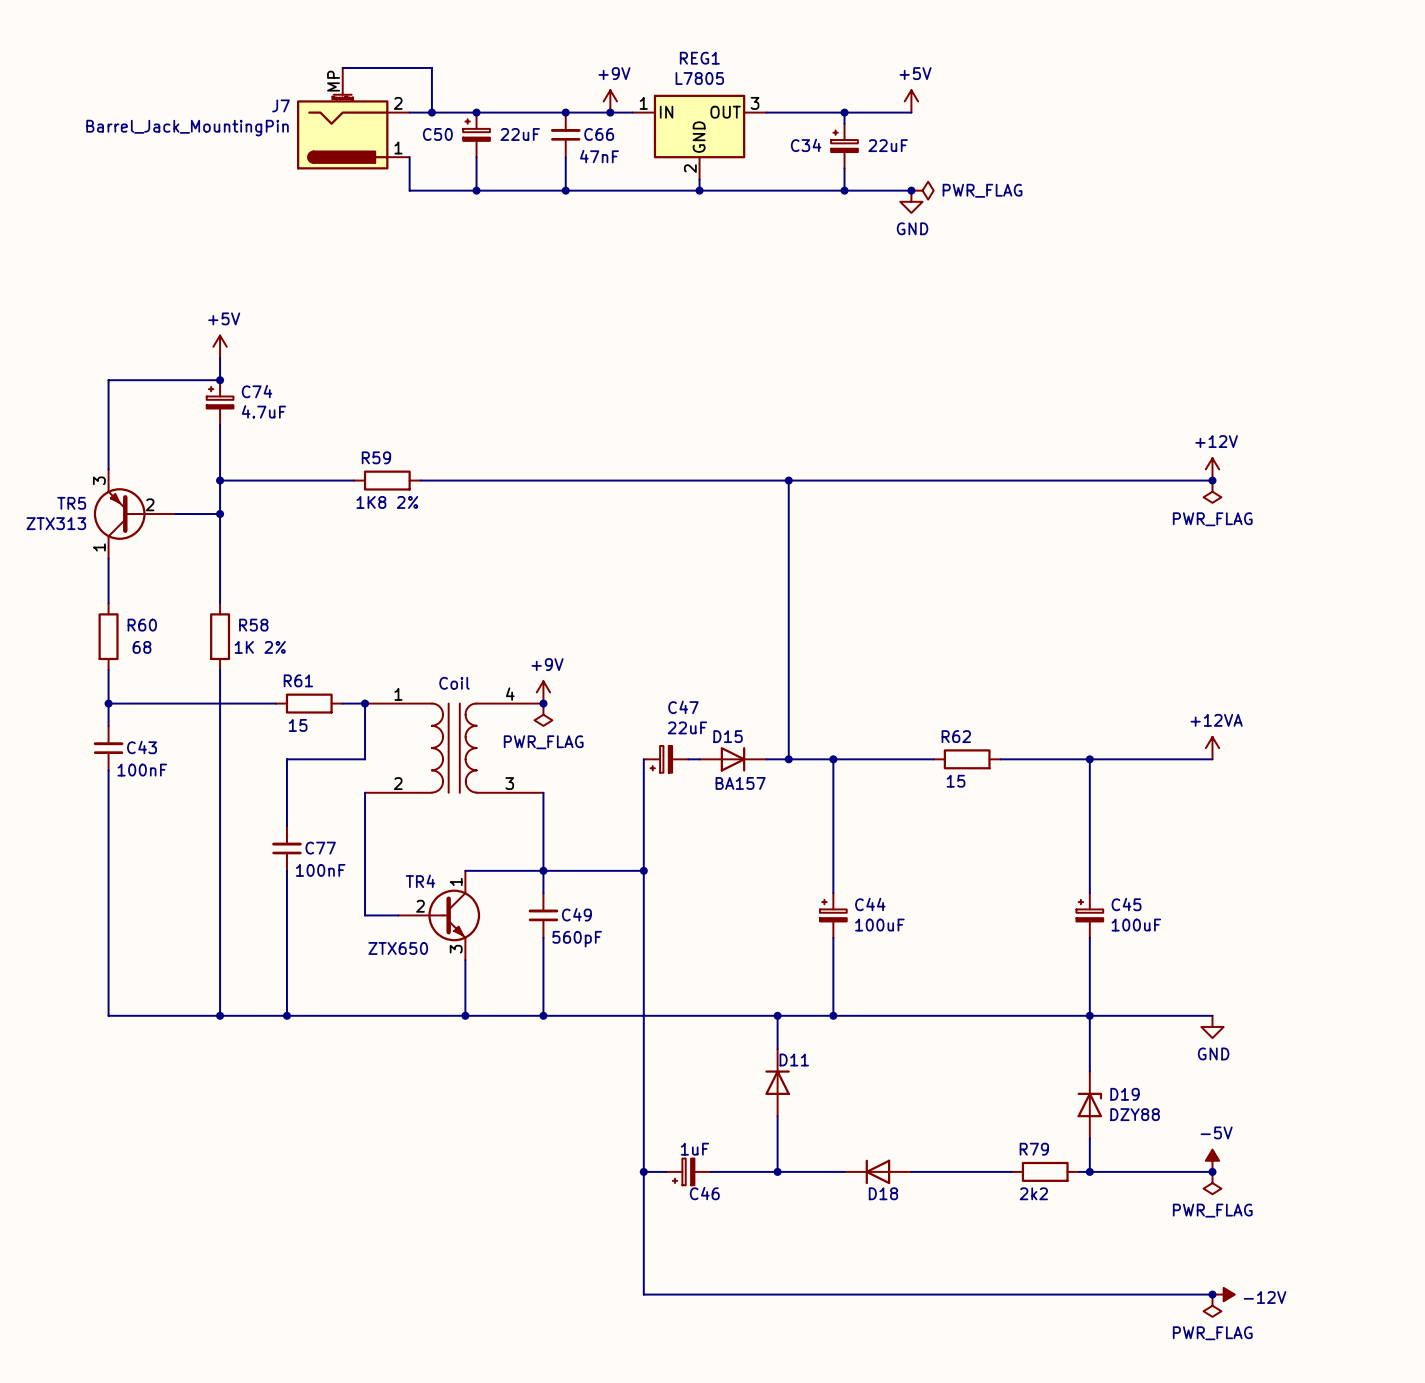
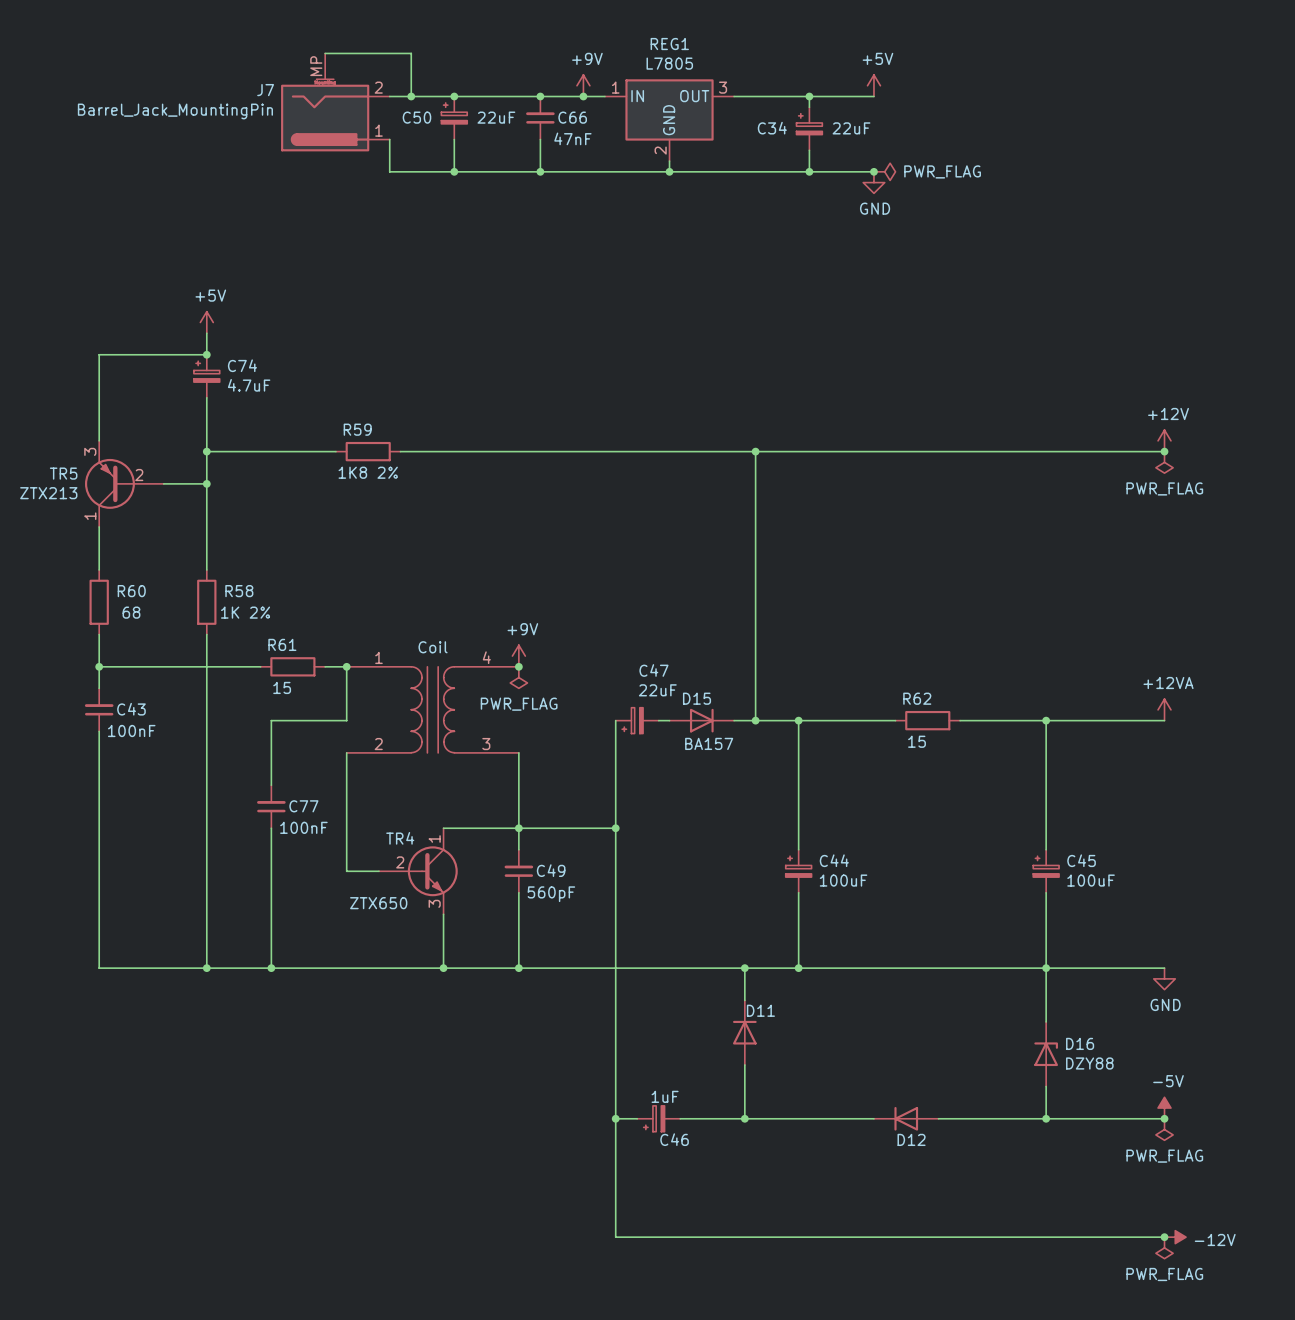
TR5 value: ZTX313 (56, 523) -> ZTX213 (48, 493)
D19 name: D19 (1125, 1094) -> D16 (1080, 1043)
D18: (877, 1171) -> none
D12: none -> (906, 1118)
wire: none -> (970, 1118) (1035, 1118)
R79: 2k2 (1045, 1171) -> none

